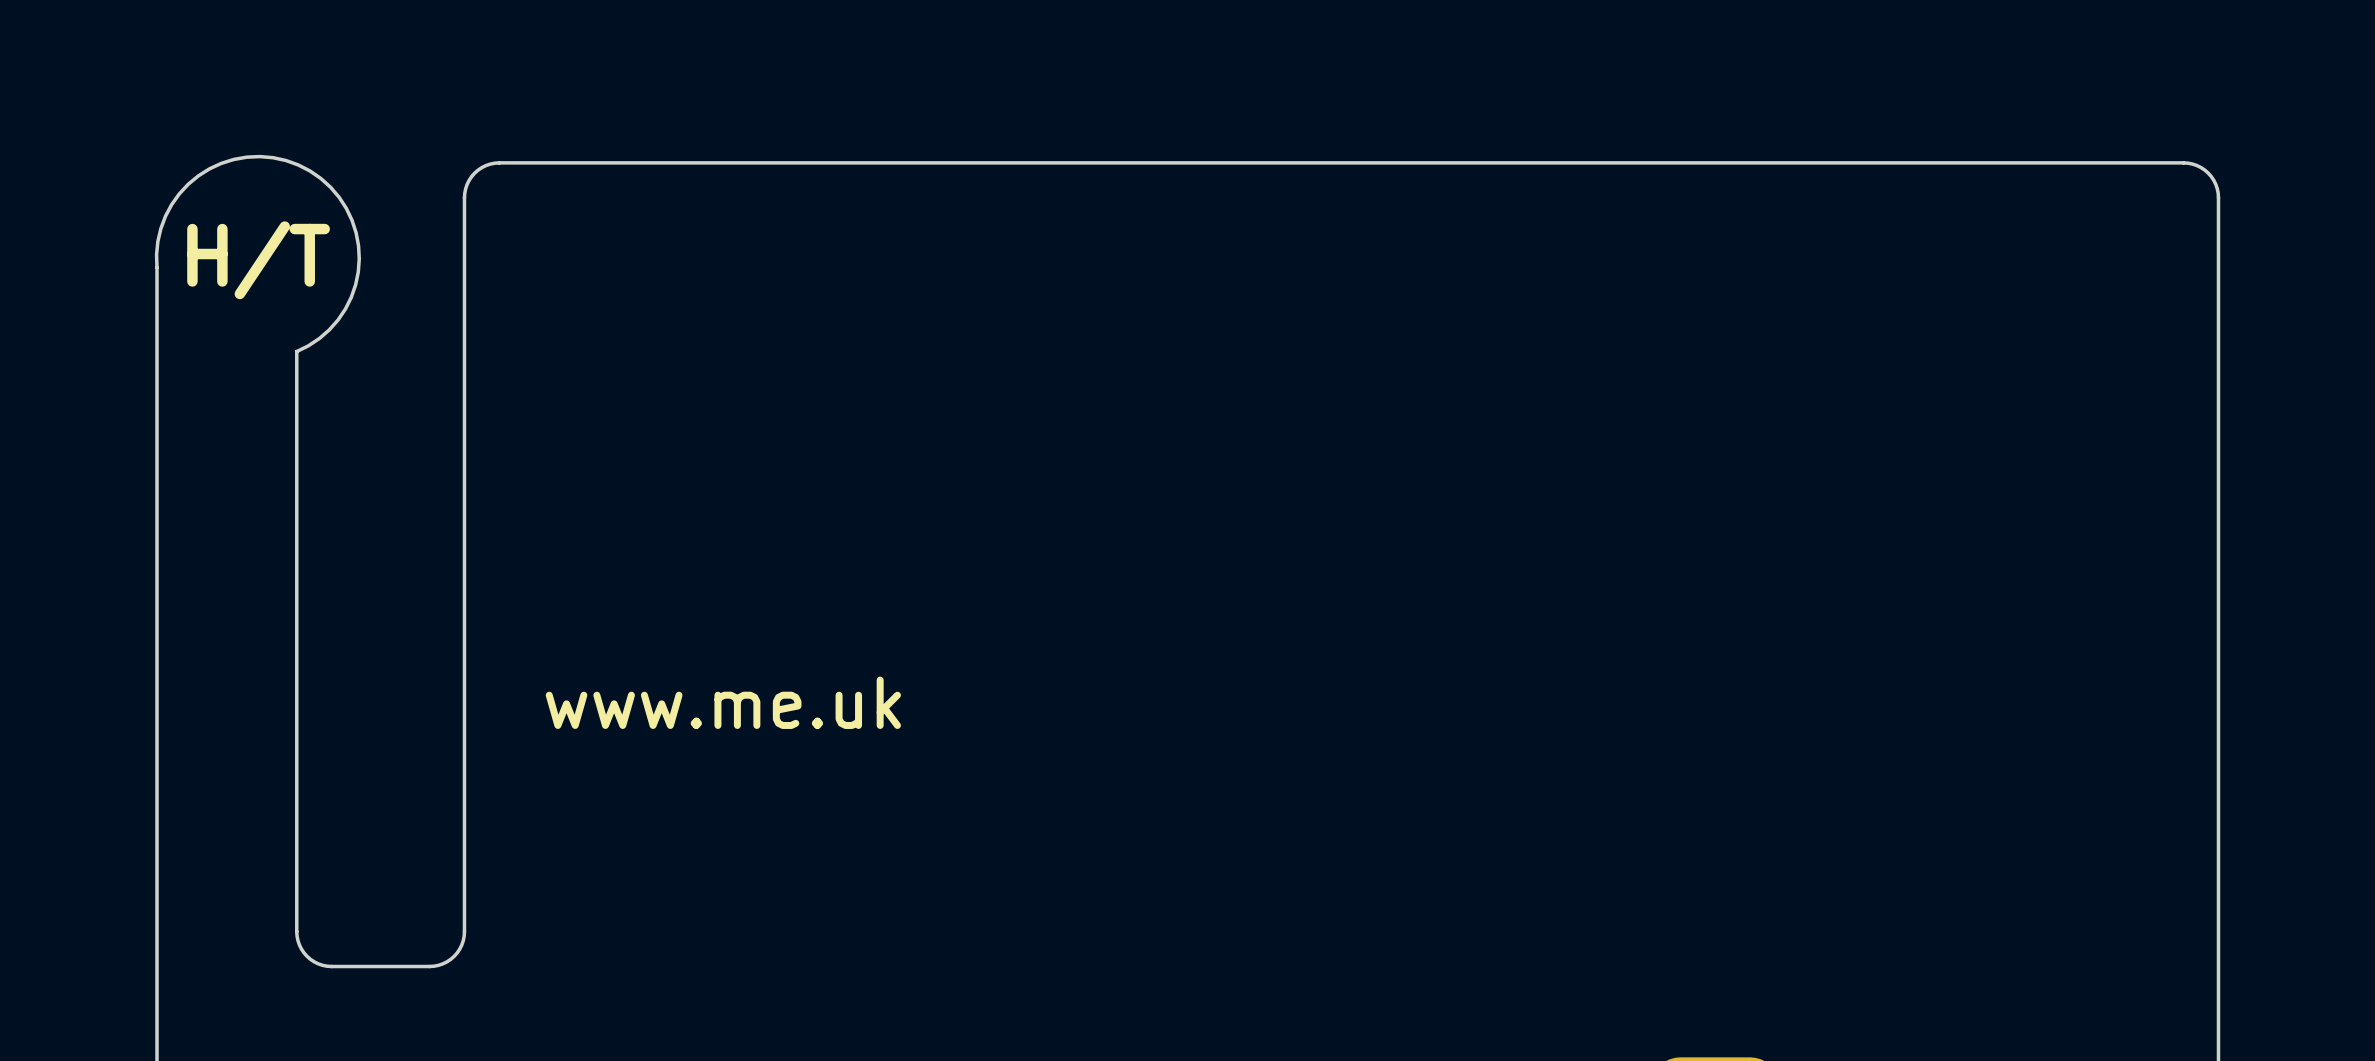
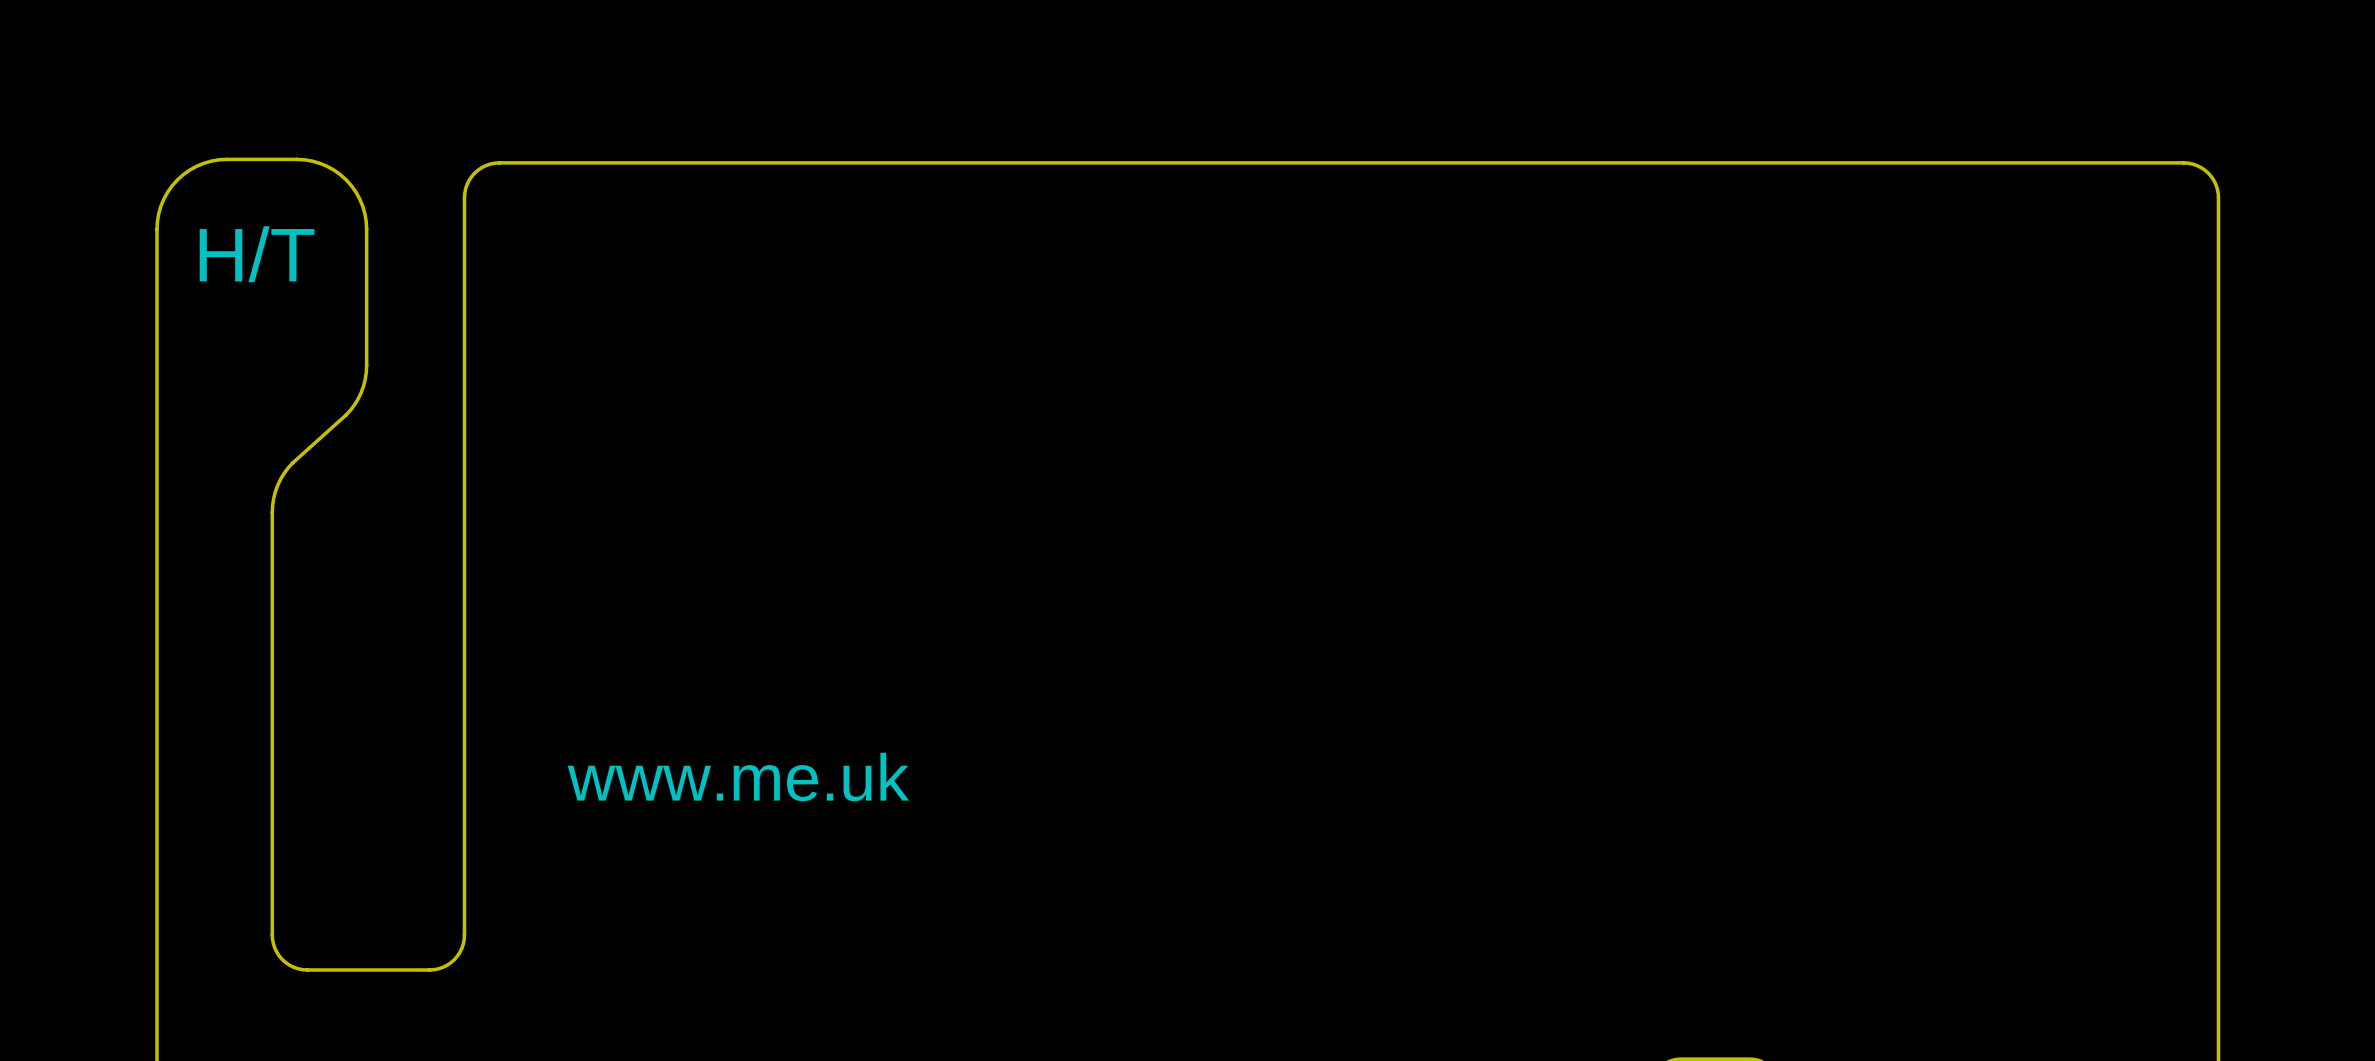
board edge: (157, 267) (157, 241) (160, 228) (171, 204) (188, 184) (198, 175) (209, 168) (233, 159) (260, 156) (273, 157) (298, 164) (310, 171) (330, 187) (346, 208) (352, 220) (358, 245) (359, 258) (358, 271) (351, 297) (345, 309) (329, 329) (319, 338) (296, 351) (297, 936) (303, 952) (314, 961) (322, 965) (429, 966) (442, 963) (454, 956) (461, 944) (464, 931) -> (157, 267) (157, 221) (163, 198) (177, 179) (189, 170) (203, 163) (226, 159) (312, 161) (327, 166) (340, 174) (351, 185) (359, 198) (364, 213) (366, 229) (366, 365) (363, 385) (358, 398) (346, 414) (288, 467) (277, 485) (272, 505) (272, 939) (274, 948) (282, 959) (293, 967) (302, 969) (429, 970) (442, 967) (454, 959) (461, 948) (464, 931)
drawing position: (723, 702) -> (738, 776)

